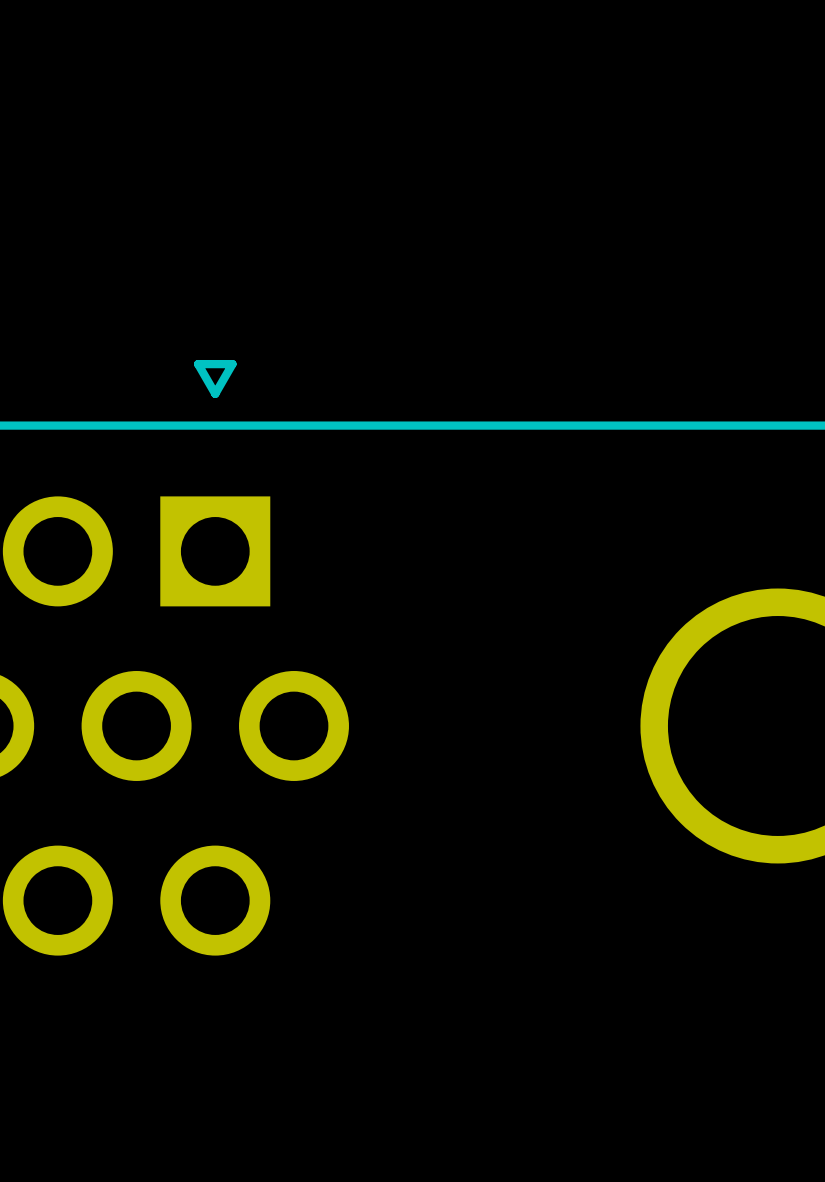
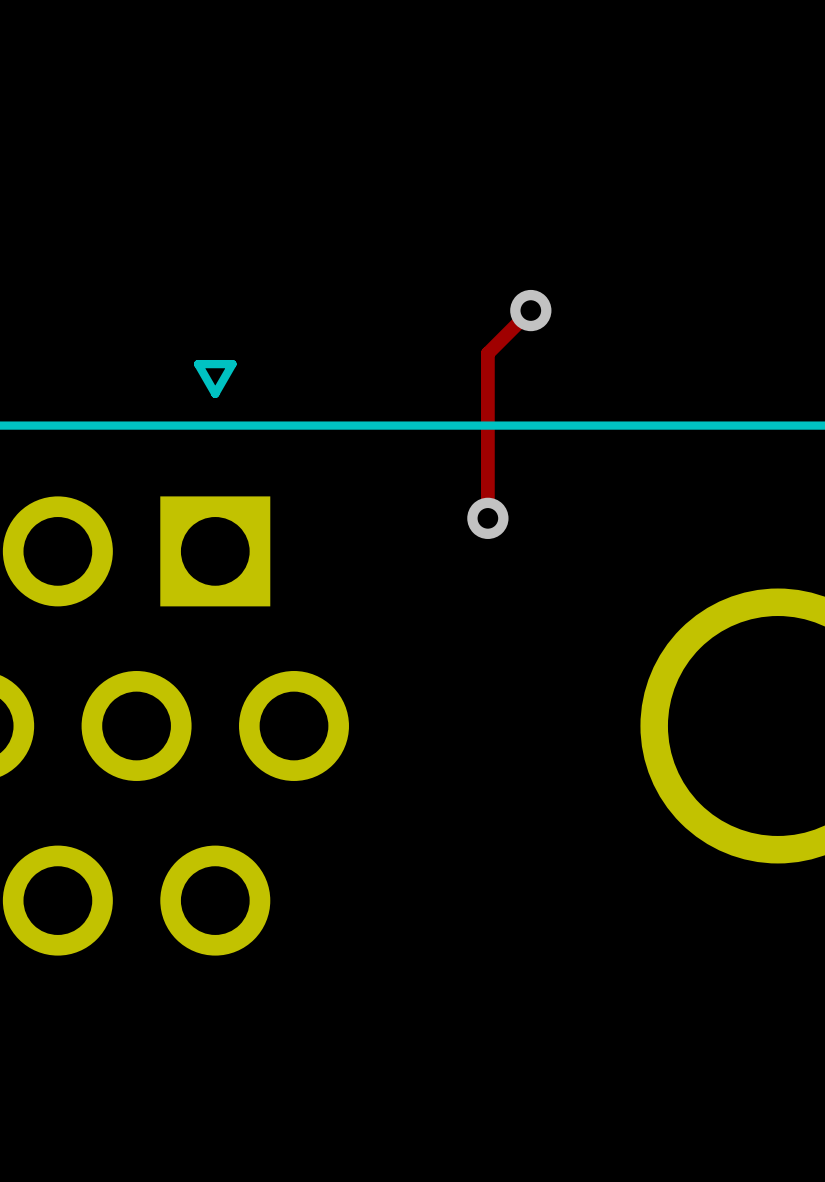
track: none -> (530, 310) (487, 353) (487, 518)
via: none -> (530, 310)
via: none -> (487, 518)

